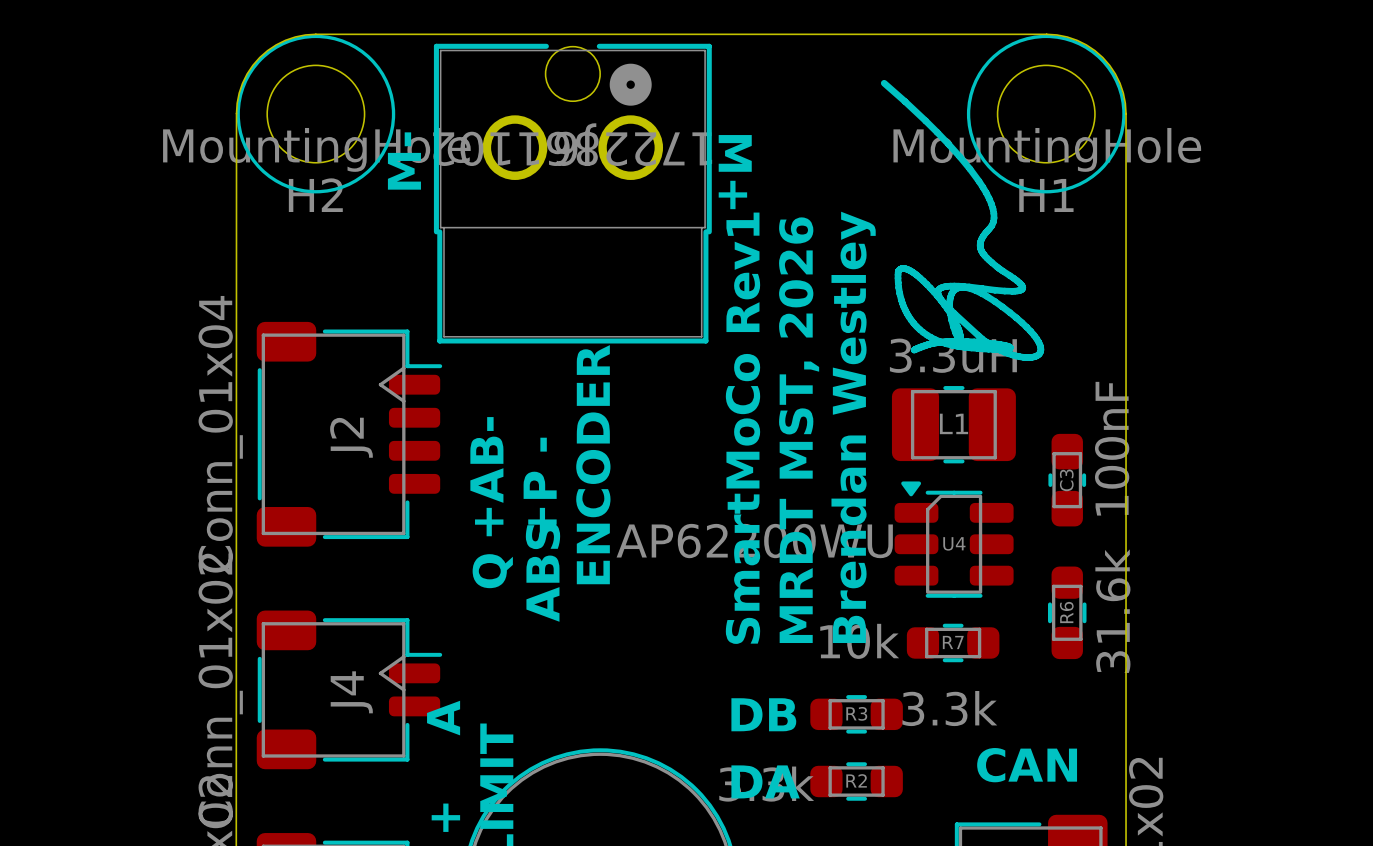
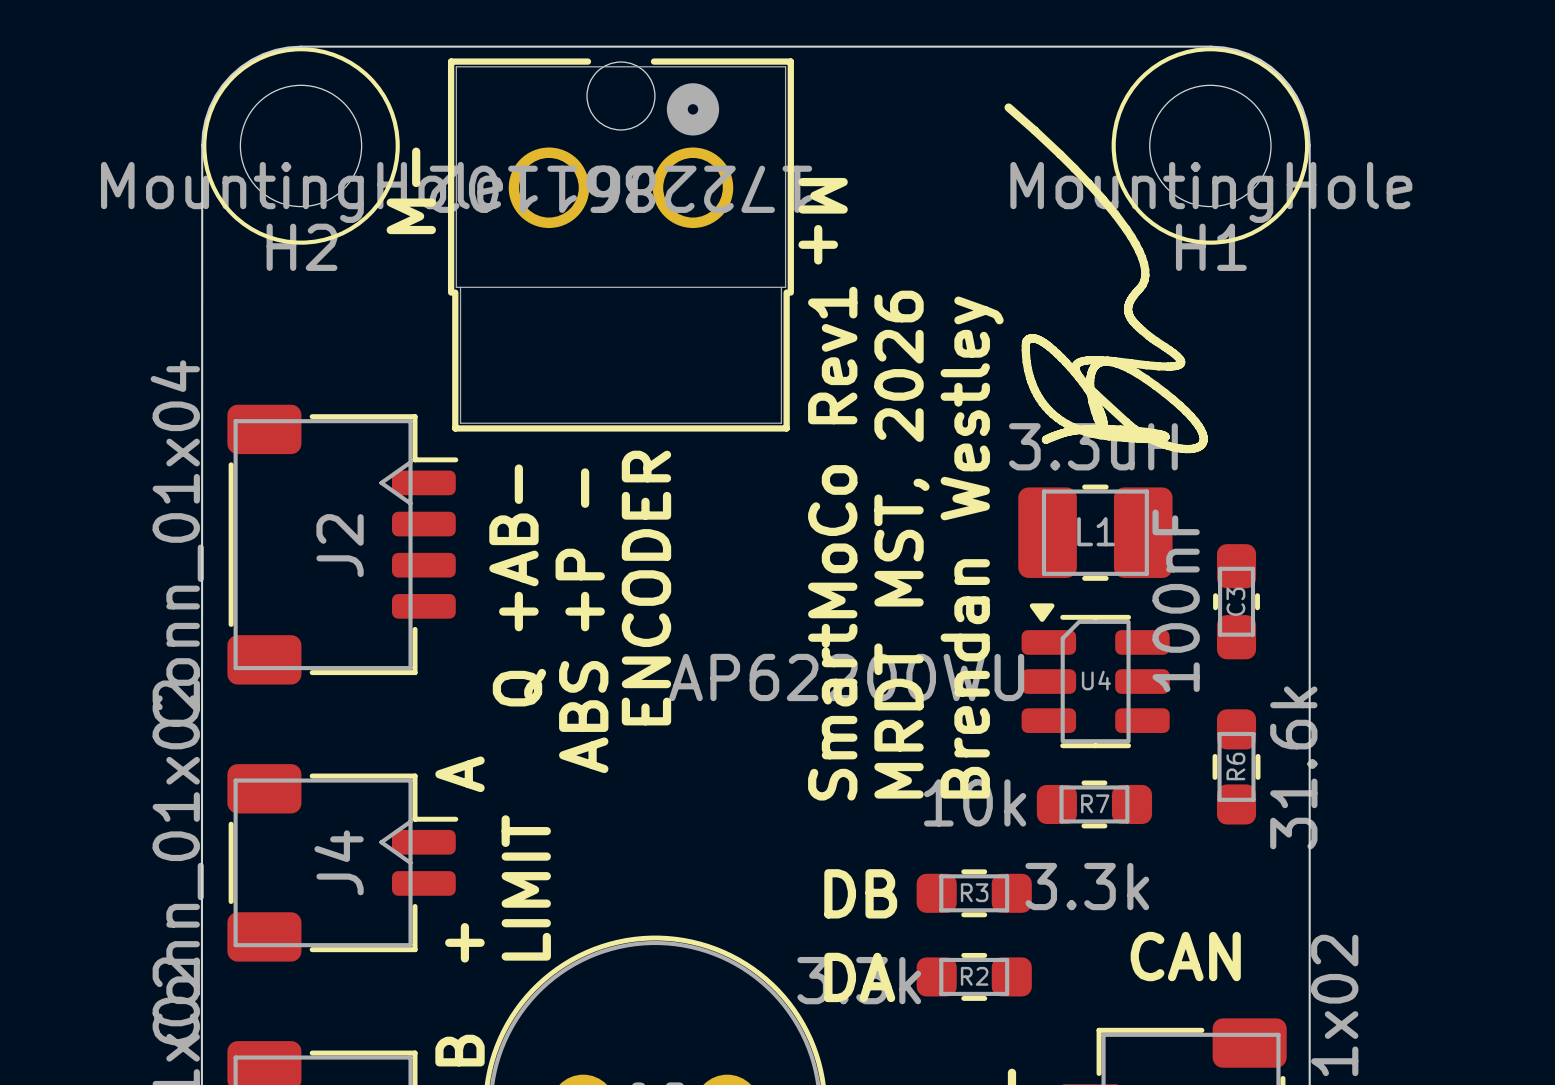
C3 value position: 100nF (1112, 448) -> 100nF (1176, 600)

